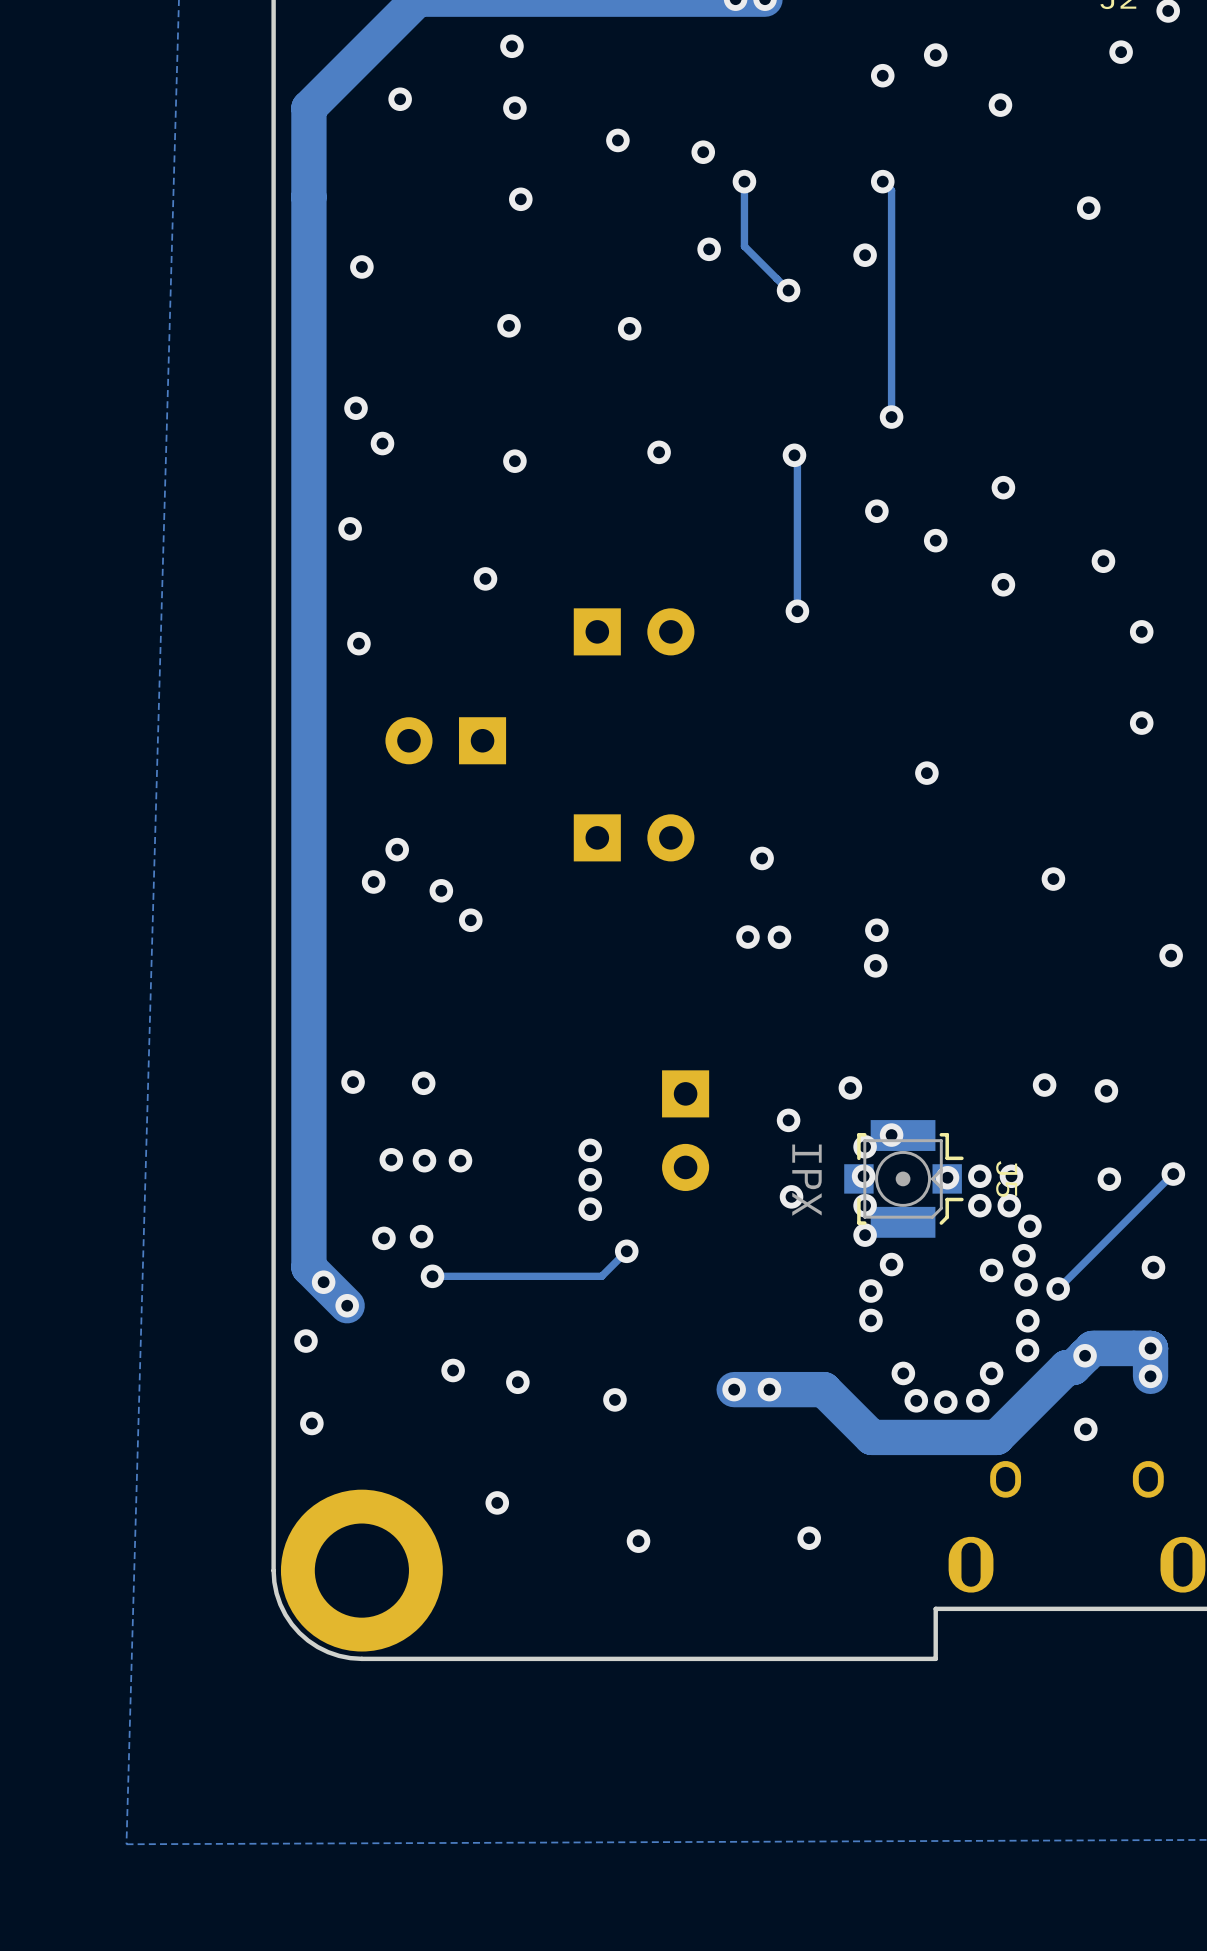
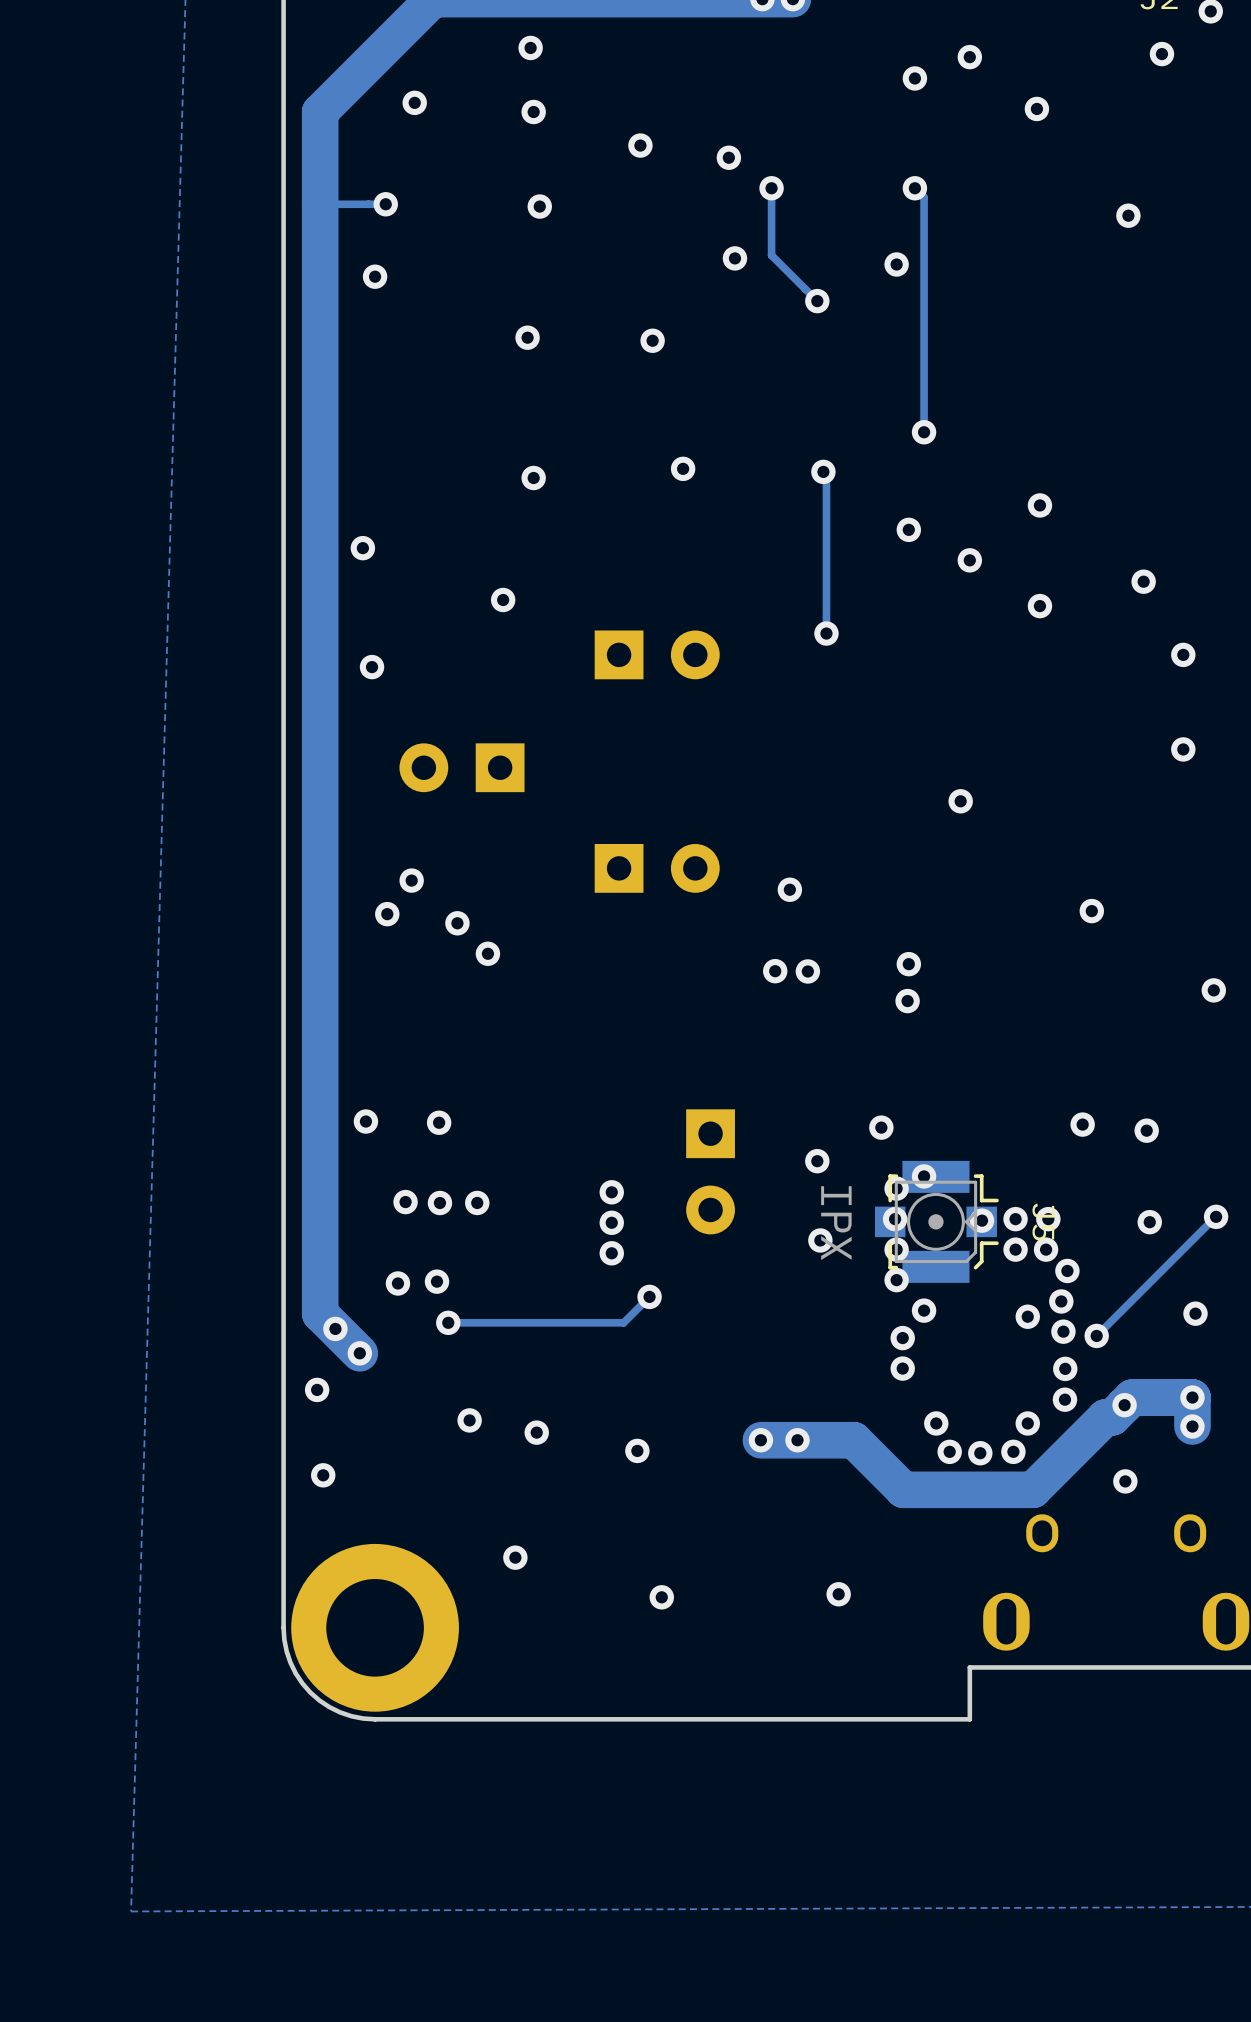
track: none -> (385, 204) (320, 204)
via: none -> (385, 204)
via: (356, 408) -> none
via: (382, 443) -> none

